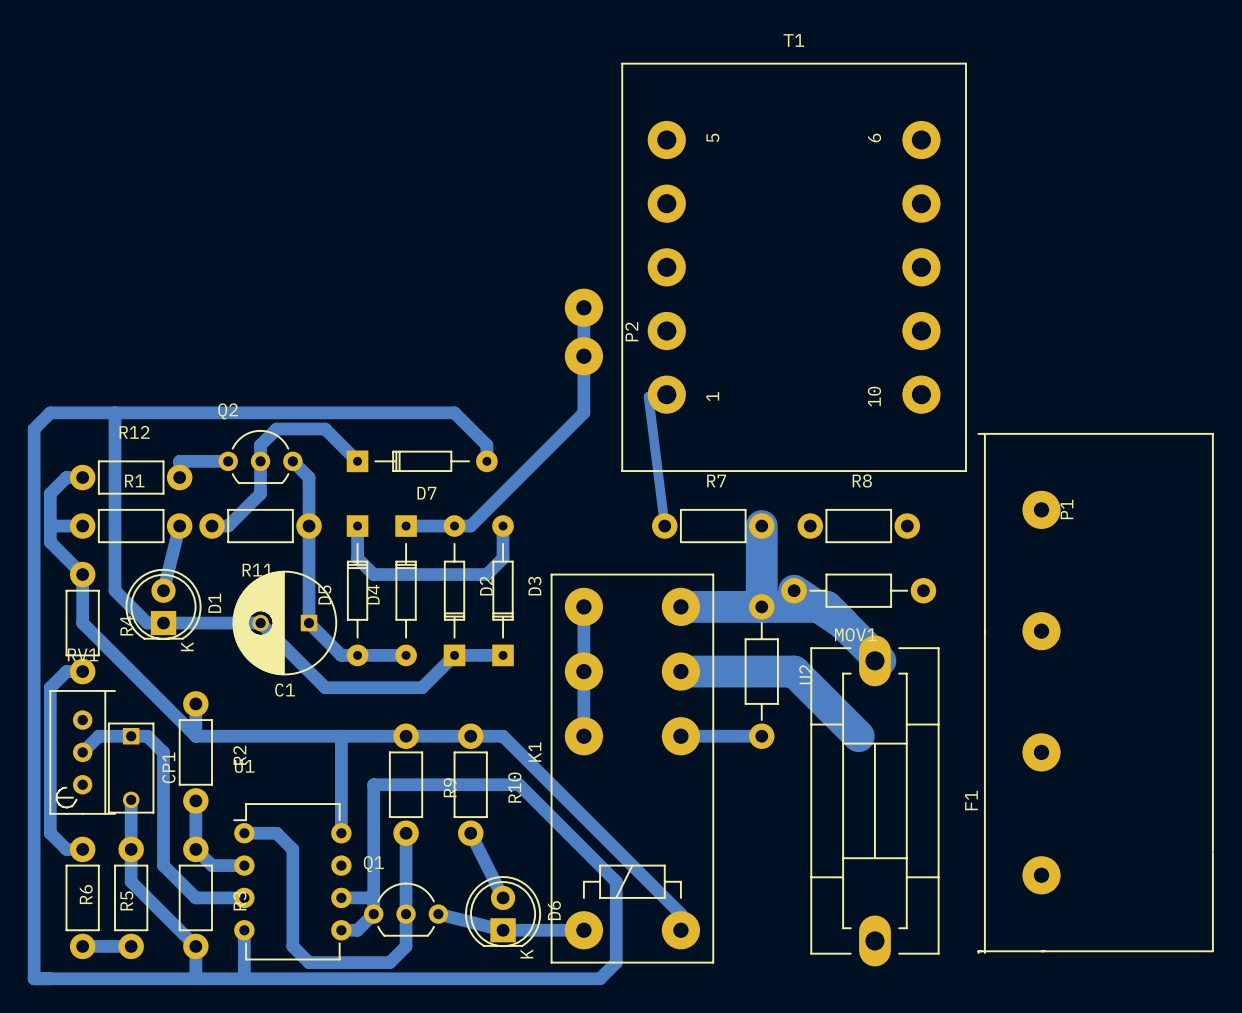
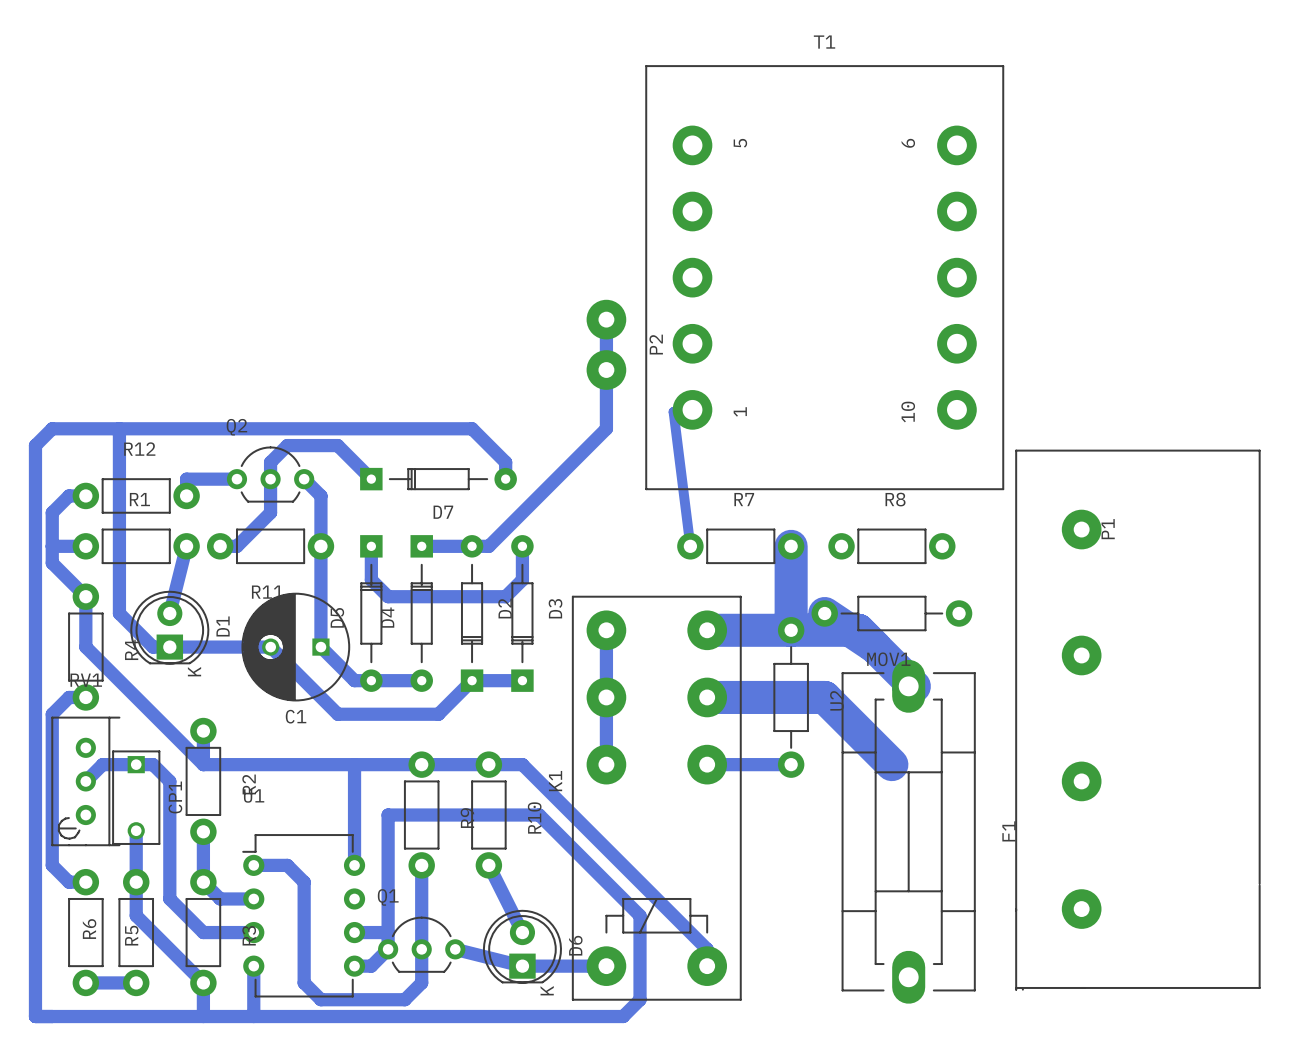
P1 footprint: [977, 432, 1214, 954] -> [1015, 449, 1261, 991]

